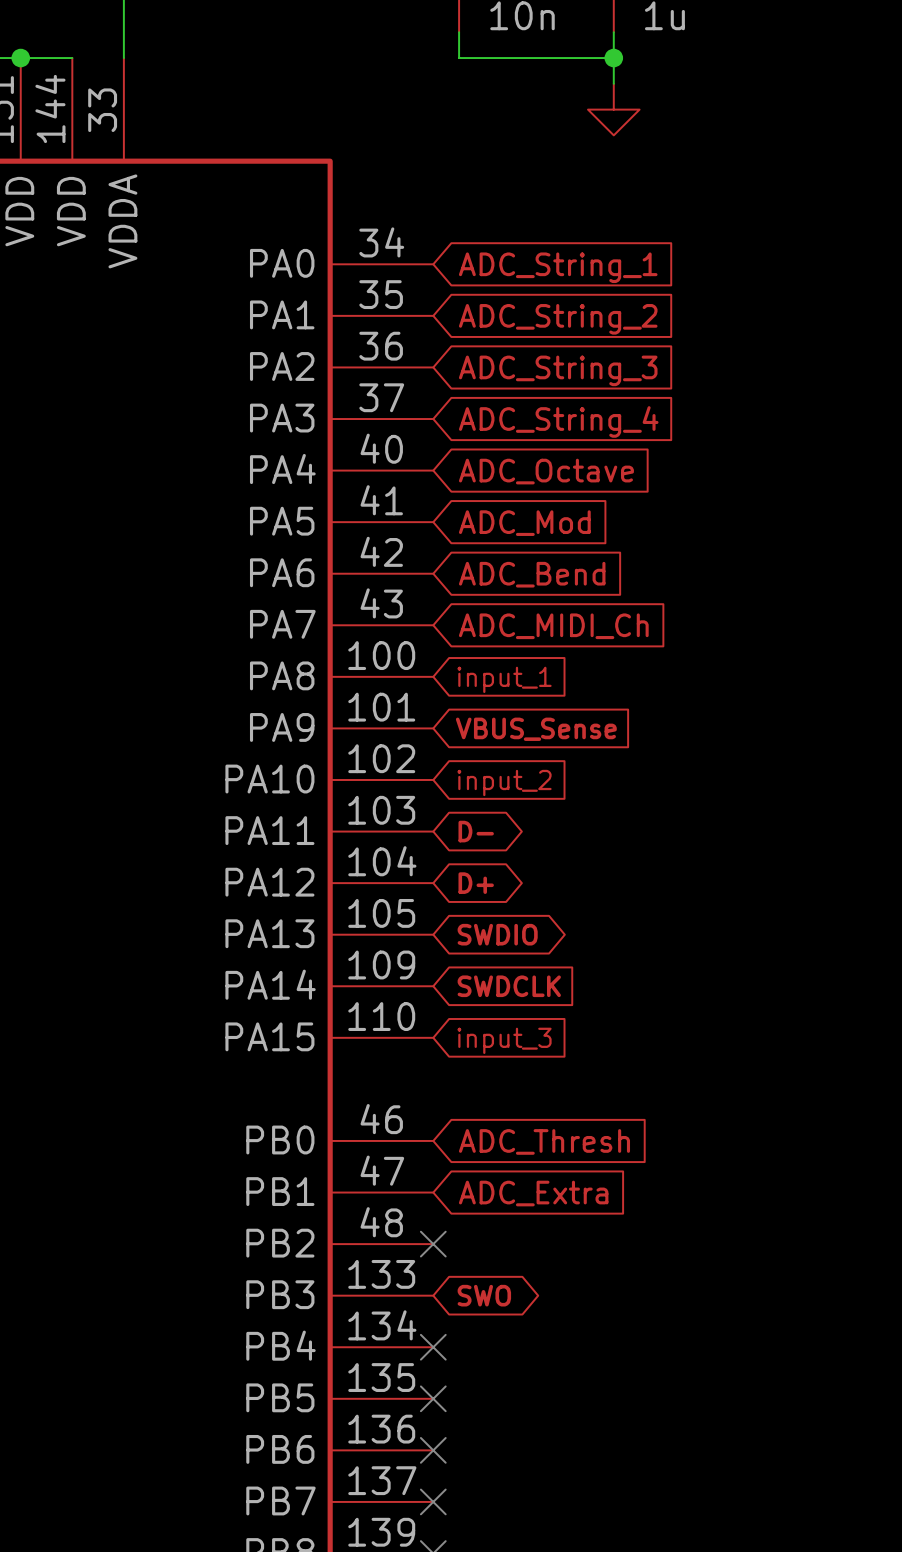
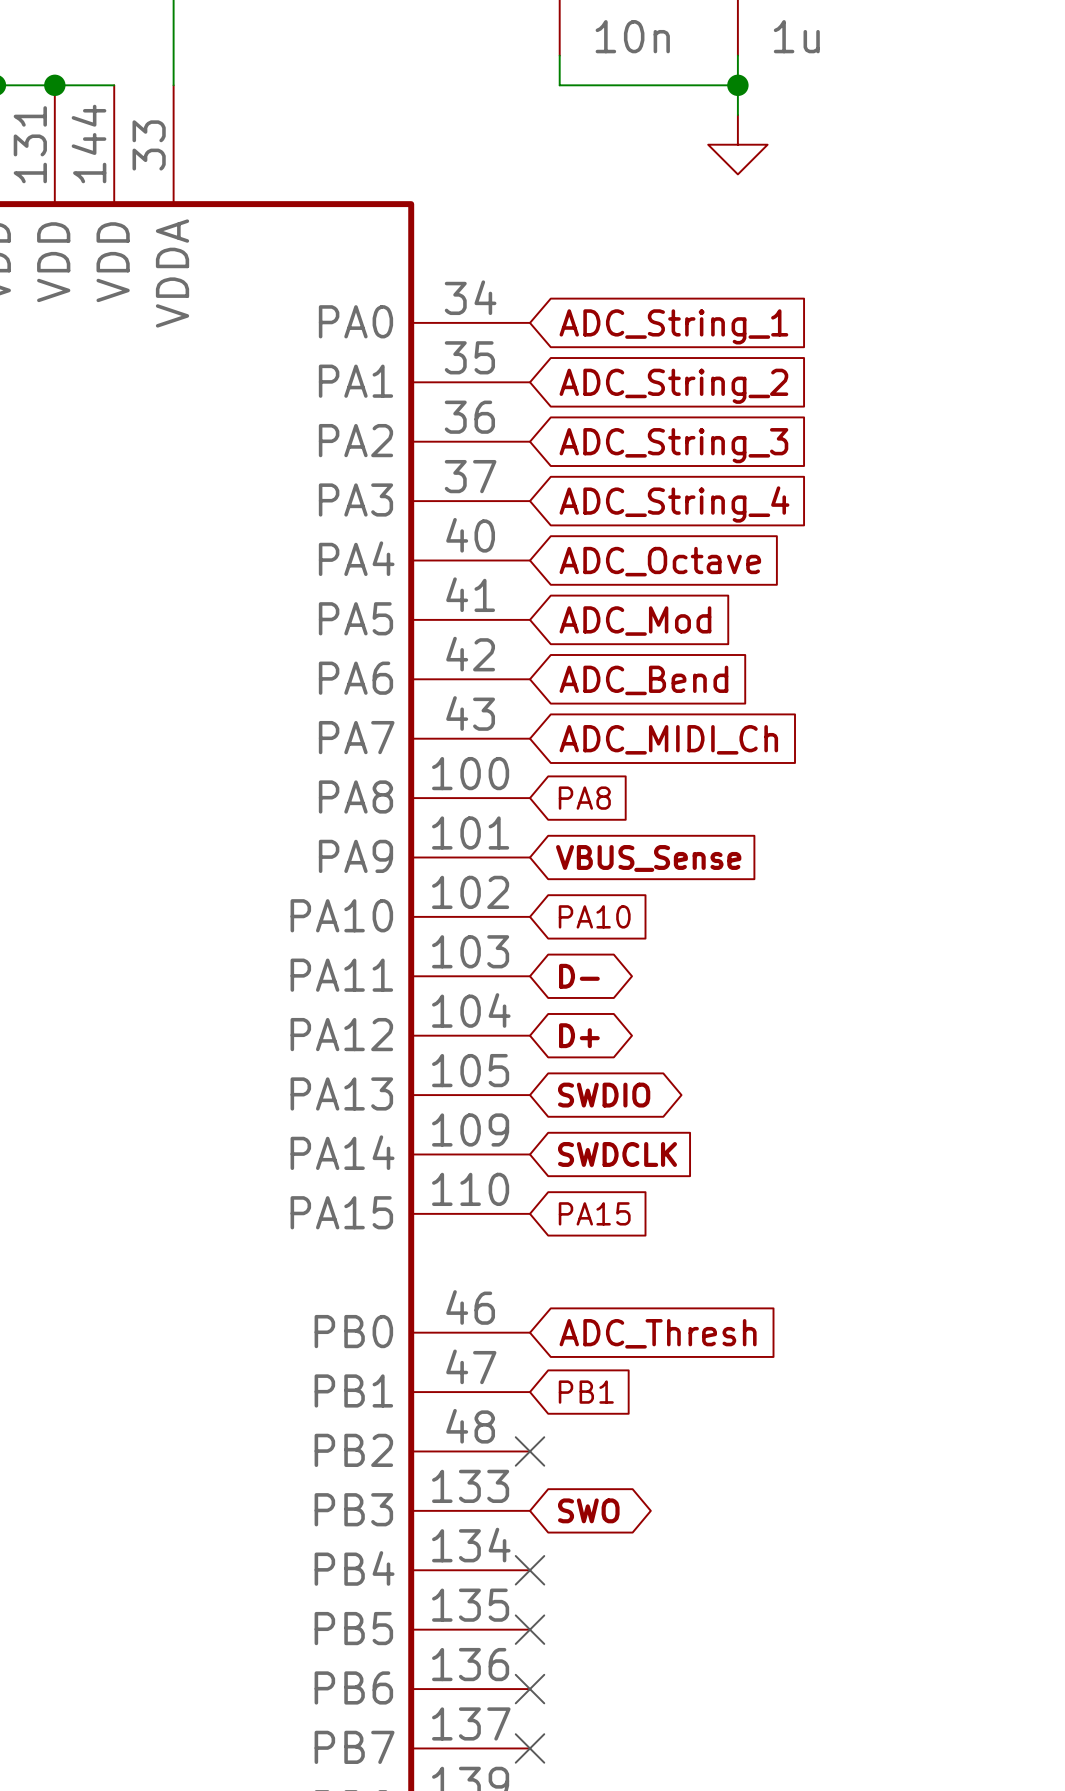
global label: input_1 (504, 679) -> PA8 (584, 798)
global label: input_2 (504, 783) -> PA10 (594, 916)
global label: input_3 (504, 1040) -> PA15 (594, 1213)
global label: ADC_Extra (533, 1193) -> PB1 (586, 1392)

